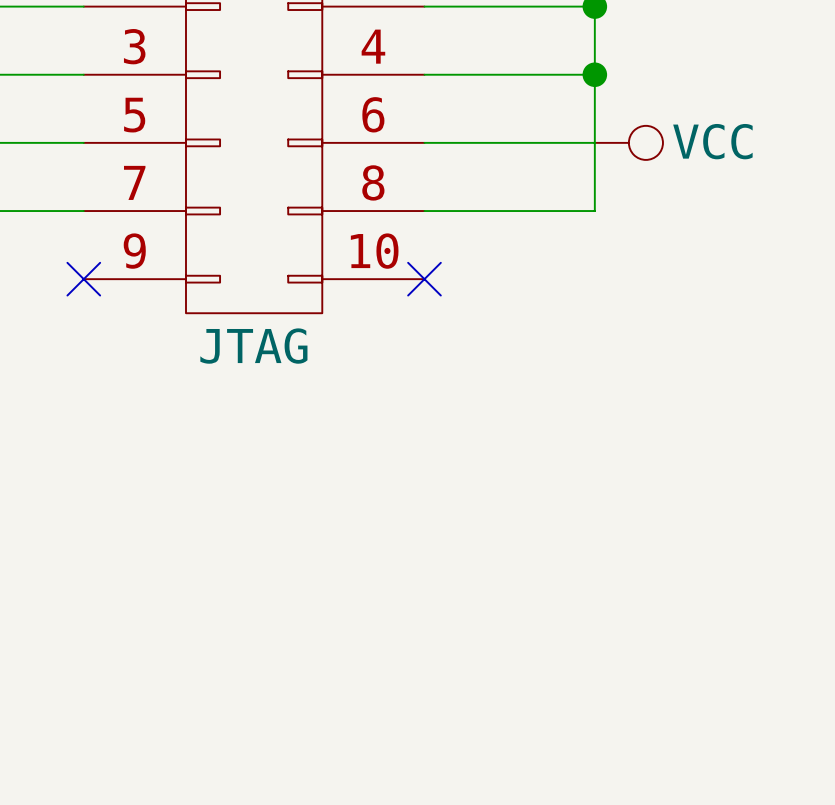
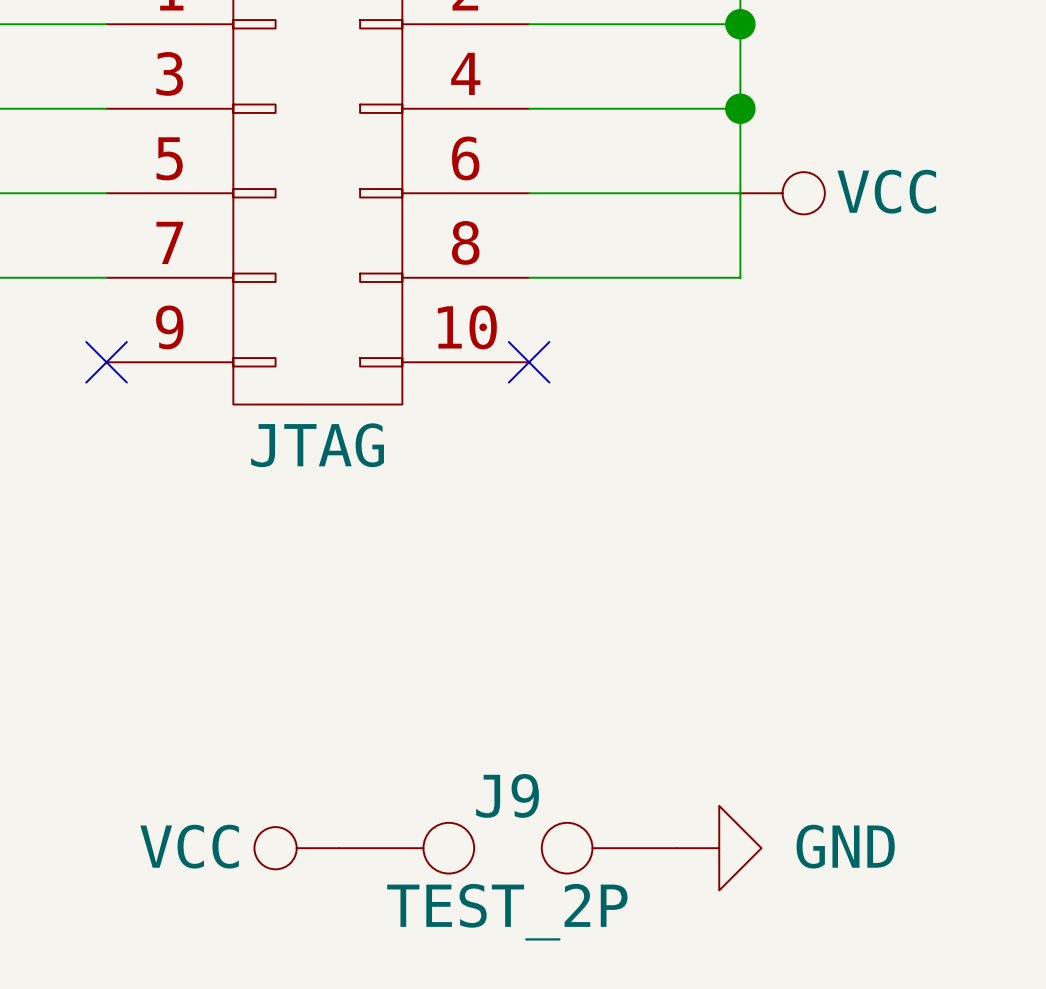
power symbol: none -> VCC (296, 848)
J9: none -> TEST_2P (507, 848)
power symbol: none -> GND (719, 848)

